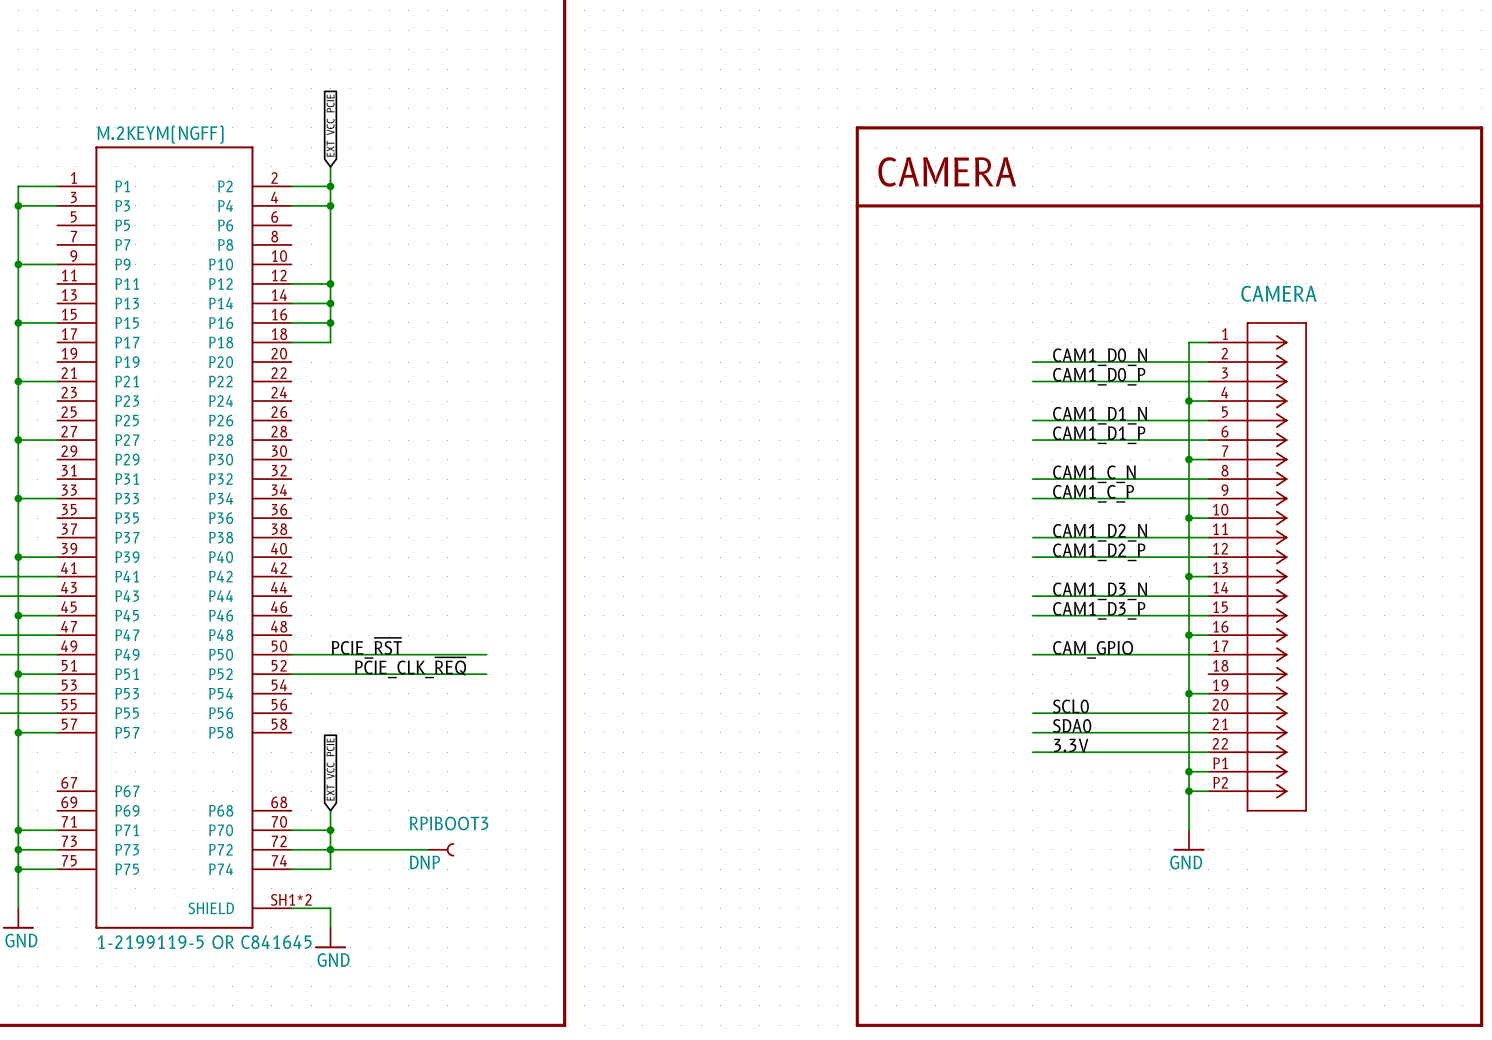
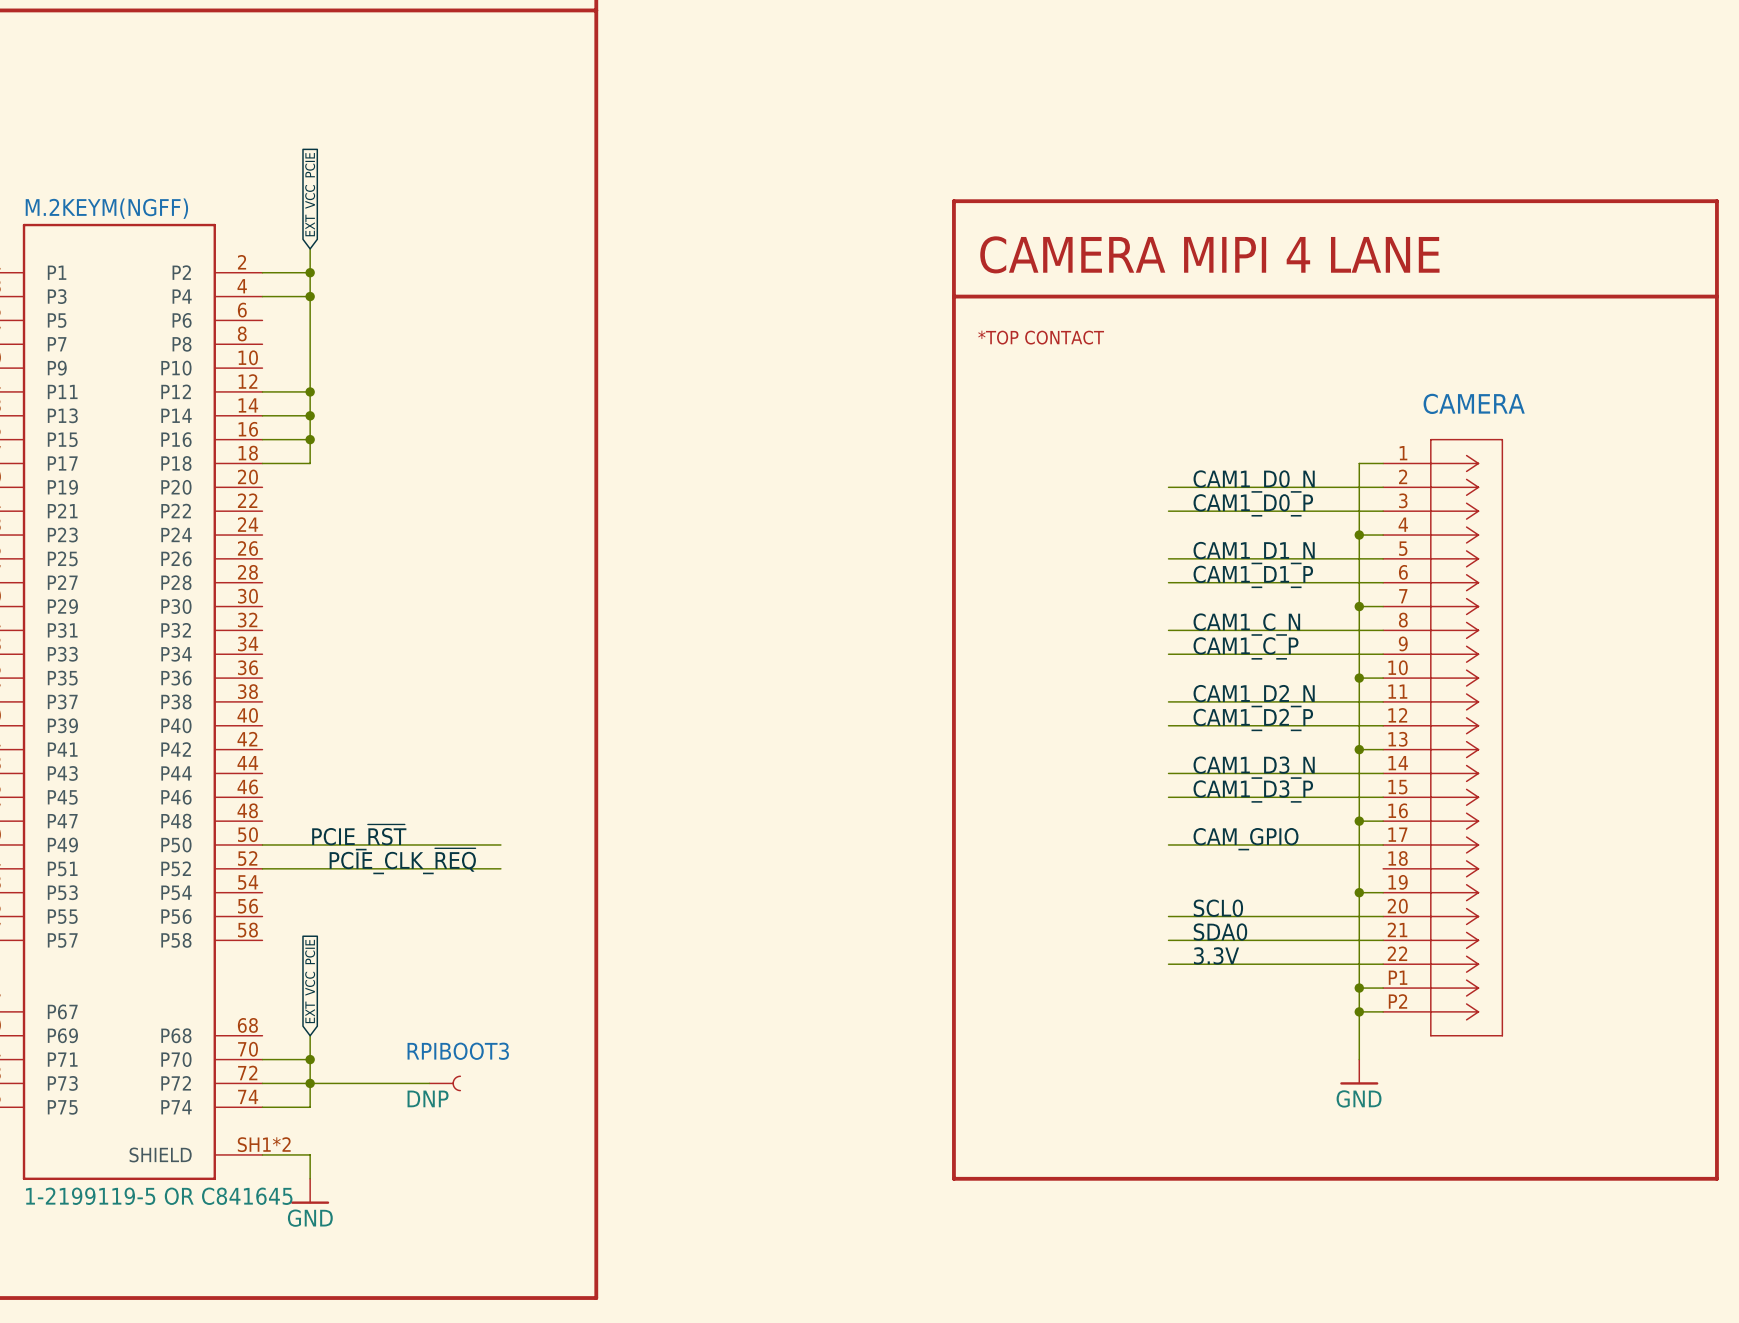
text: CAMERA (947, 171) -> CAMERA MIPI 4 LANE (1209, 254)
text: none -> *TOP CONTACT (1041, 337)
line: (857, 927) (857, 1025) (1481, 1025) (1481, 927) -> (953, 1178) (1716, 1178)

